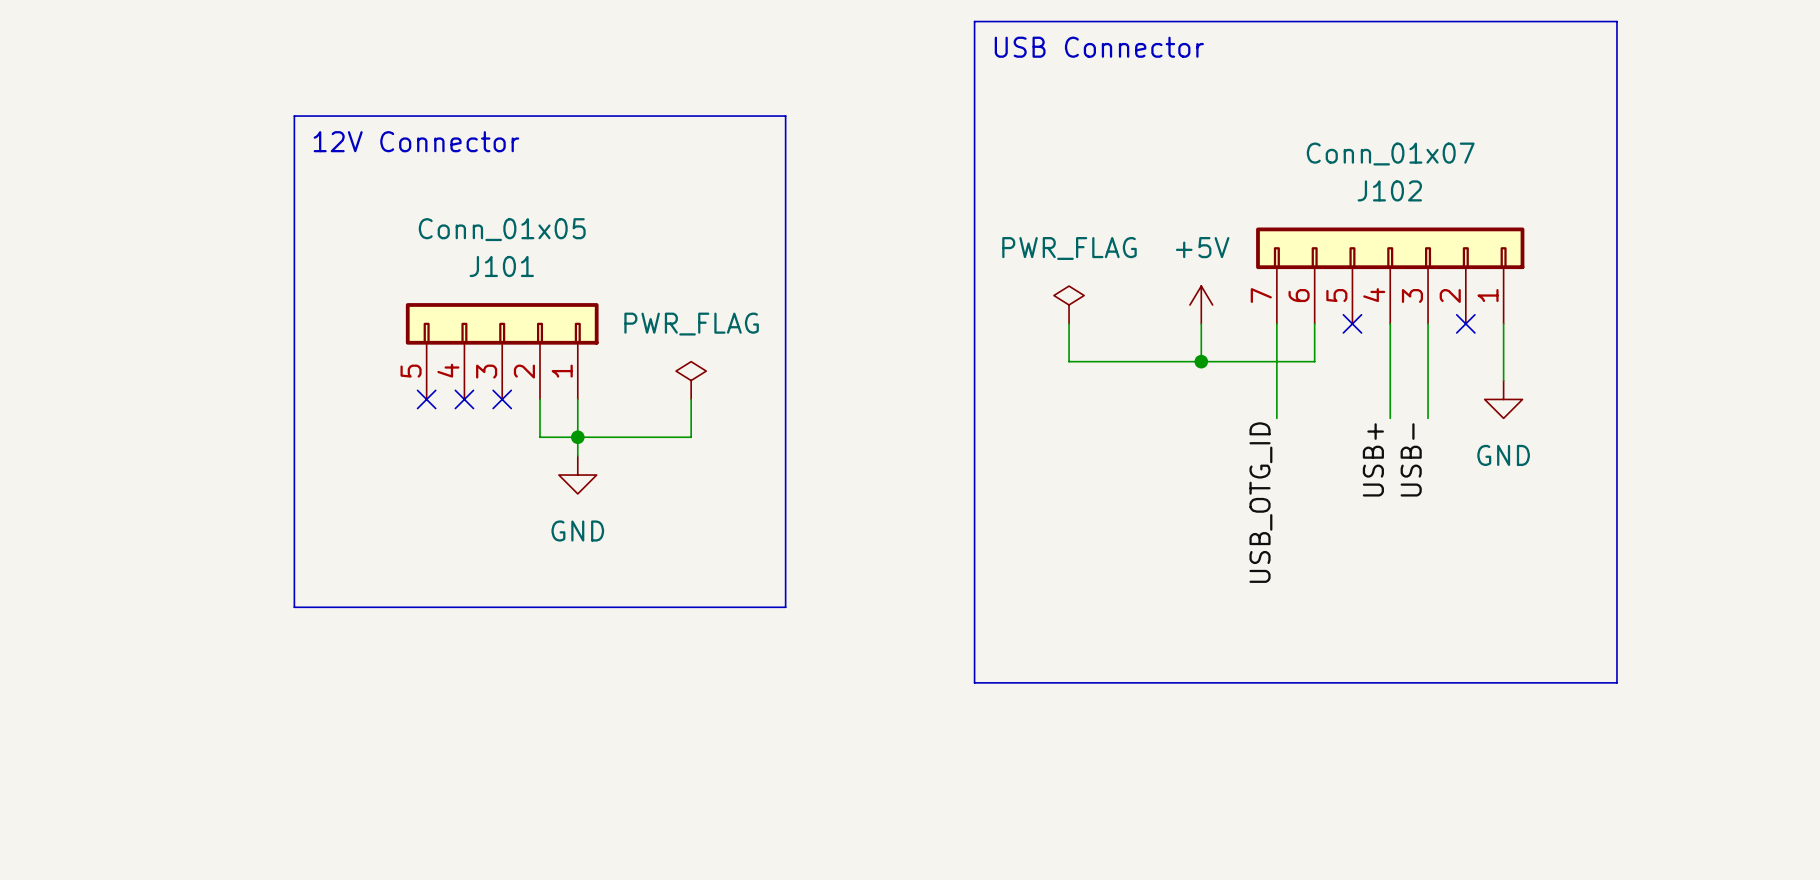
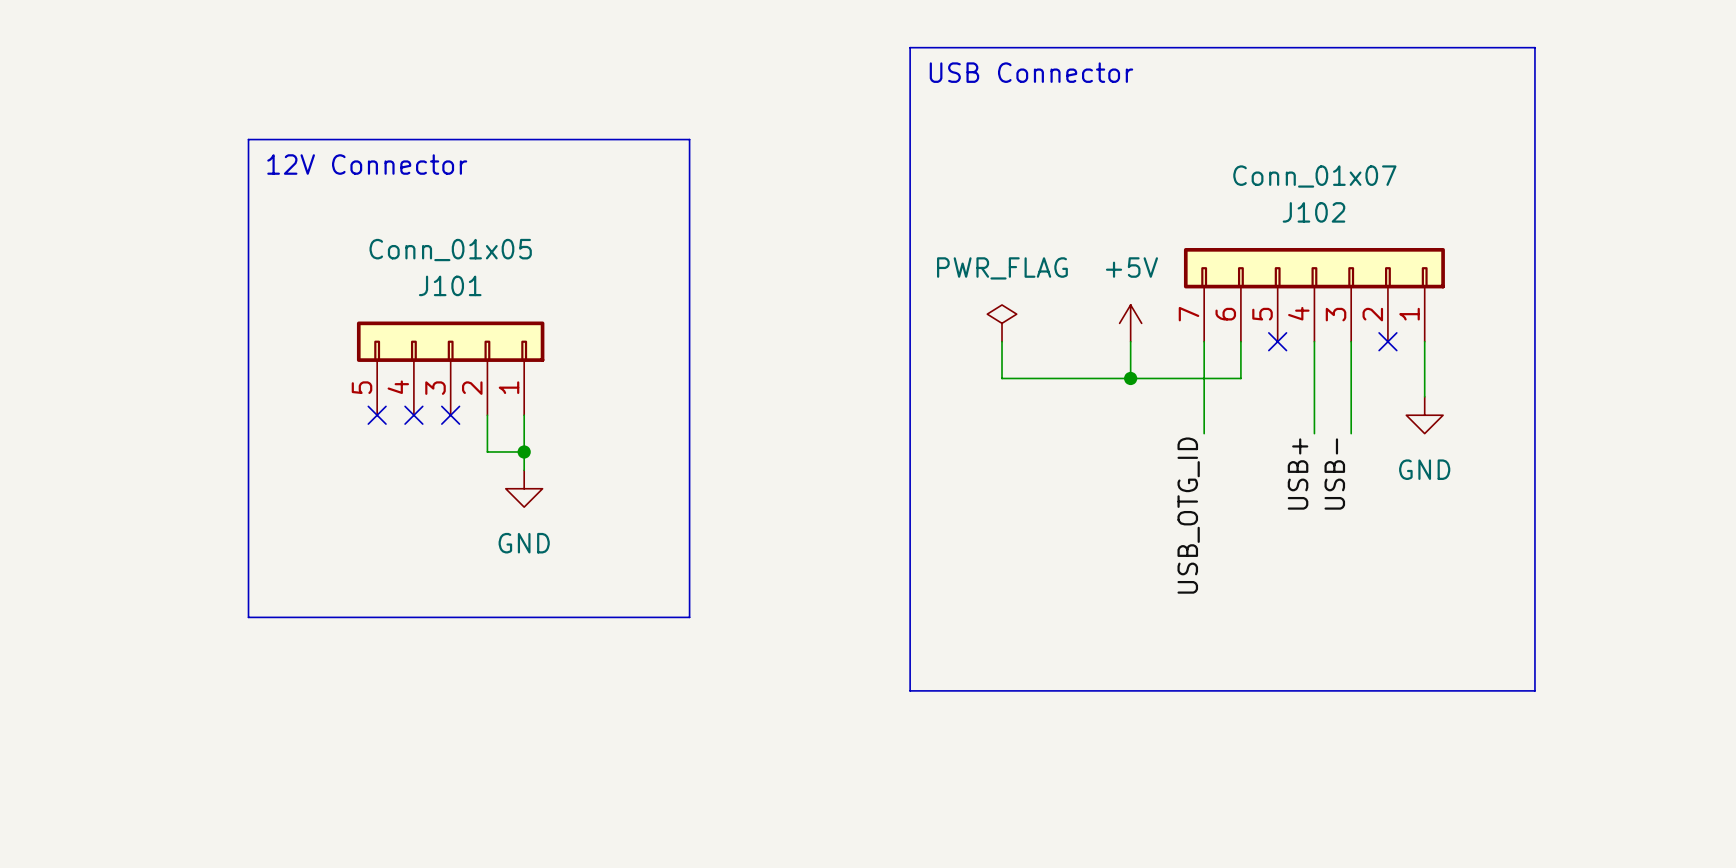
line: (747, 116) (785, 116) (785, 607) (747, 607) -> (689, 139) (689, 617)
power symbol: PWR_FLAG (691, 380) -> none
wire: (691, 399) (691, 437) (577, 437) -> none

